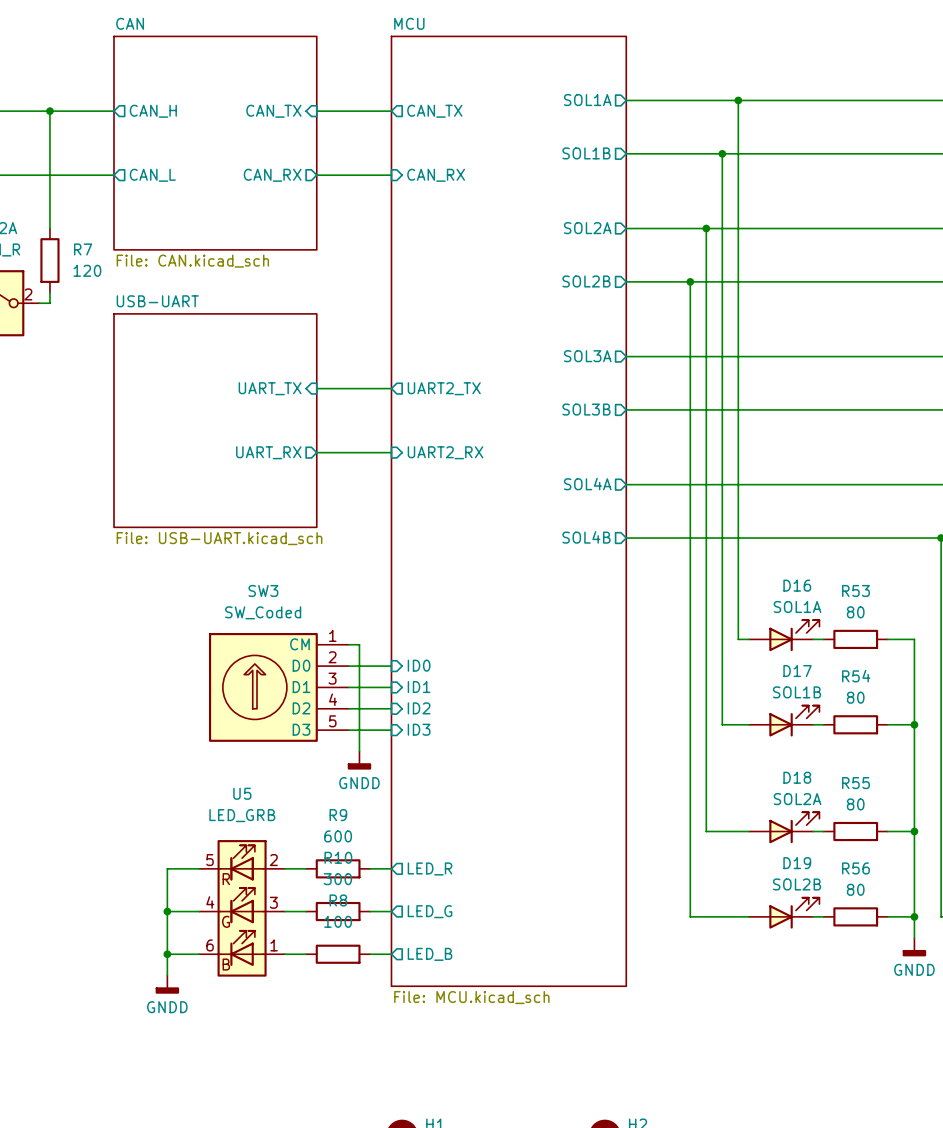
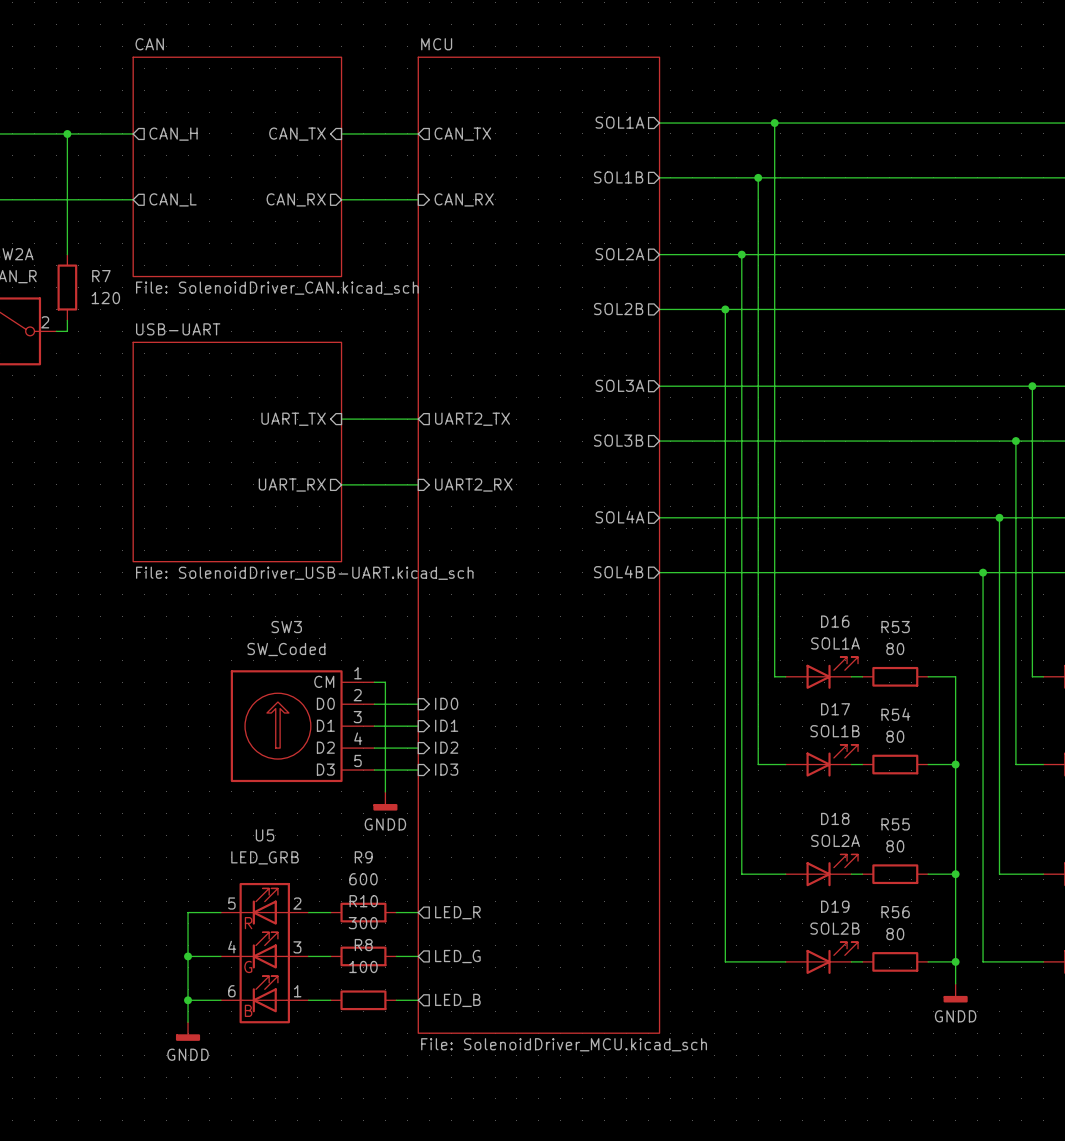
sheet CAN value: File: CAN.kicad_sch (192, 261) -> File: SolenoidDriver_CAN.kicad_sch (277, 288)
sheet USB-UART value: File: USB-UART.kicad_sch (219, 538) -> File: SolenoidDriver_USB-UART.kicad_sch (304, 573)
sheet MCU value: File: MCU.kicad_sch (471, 997) -> File: SolenoidDriver_MCU.kicad_sch (564, 1044)

